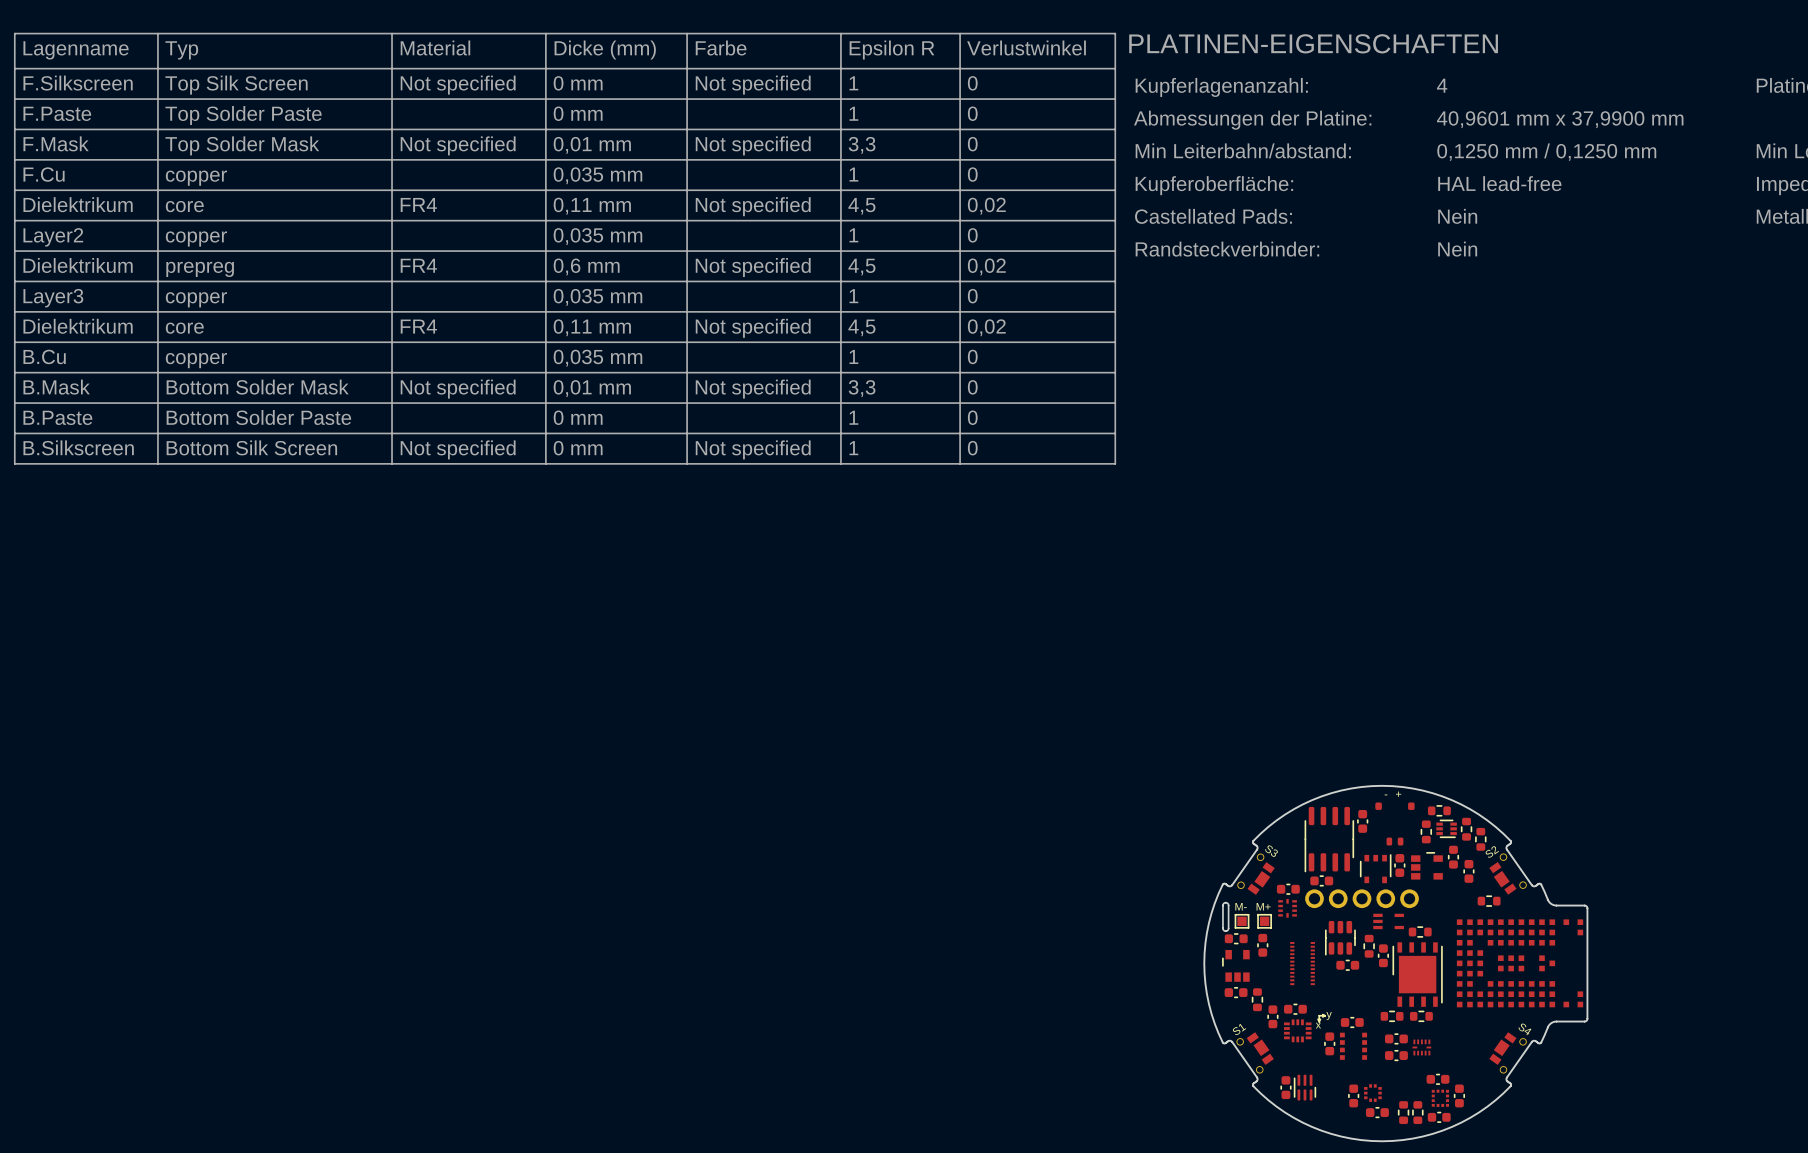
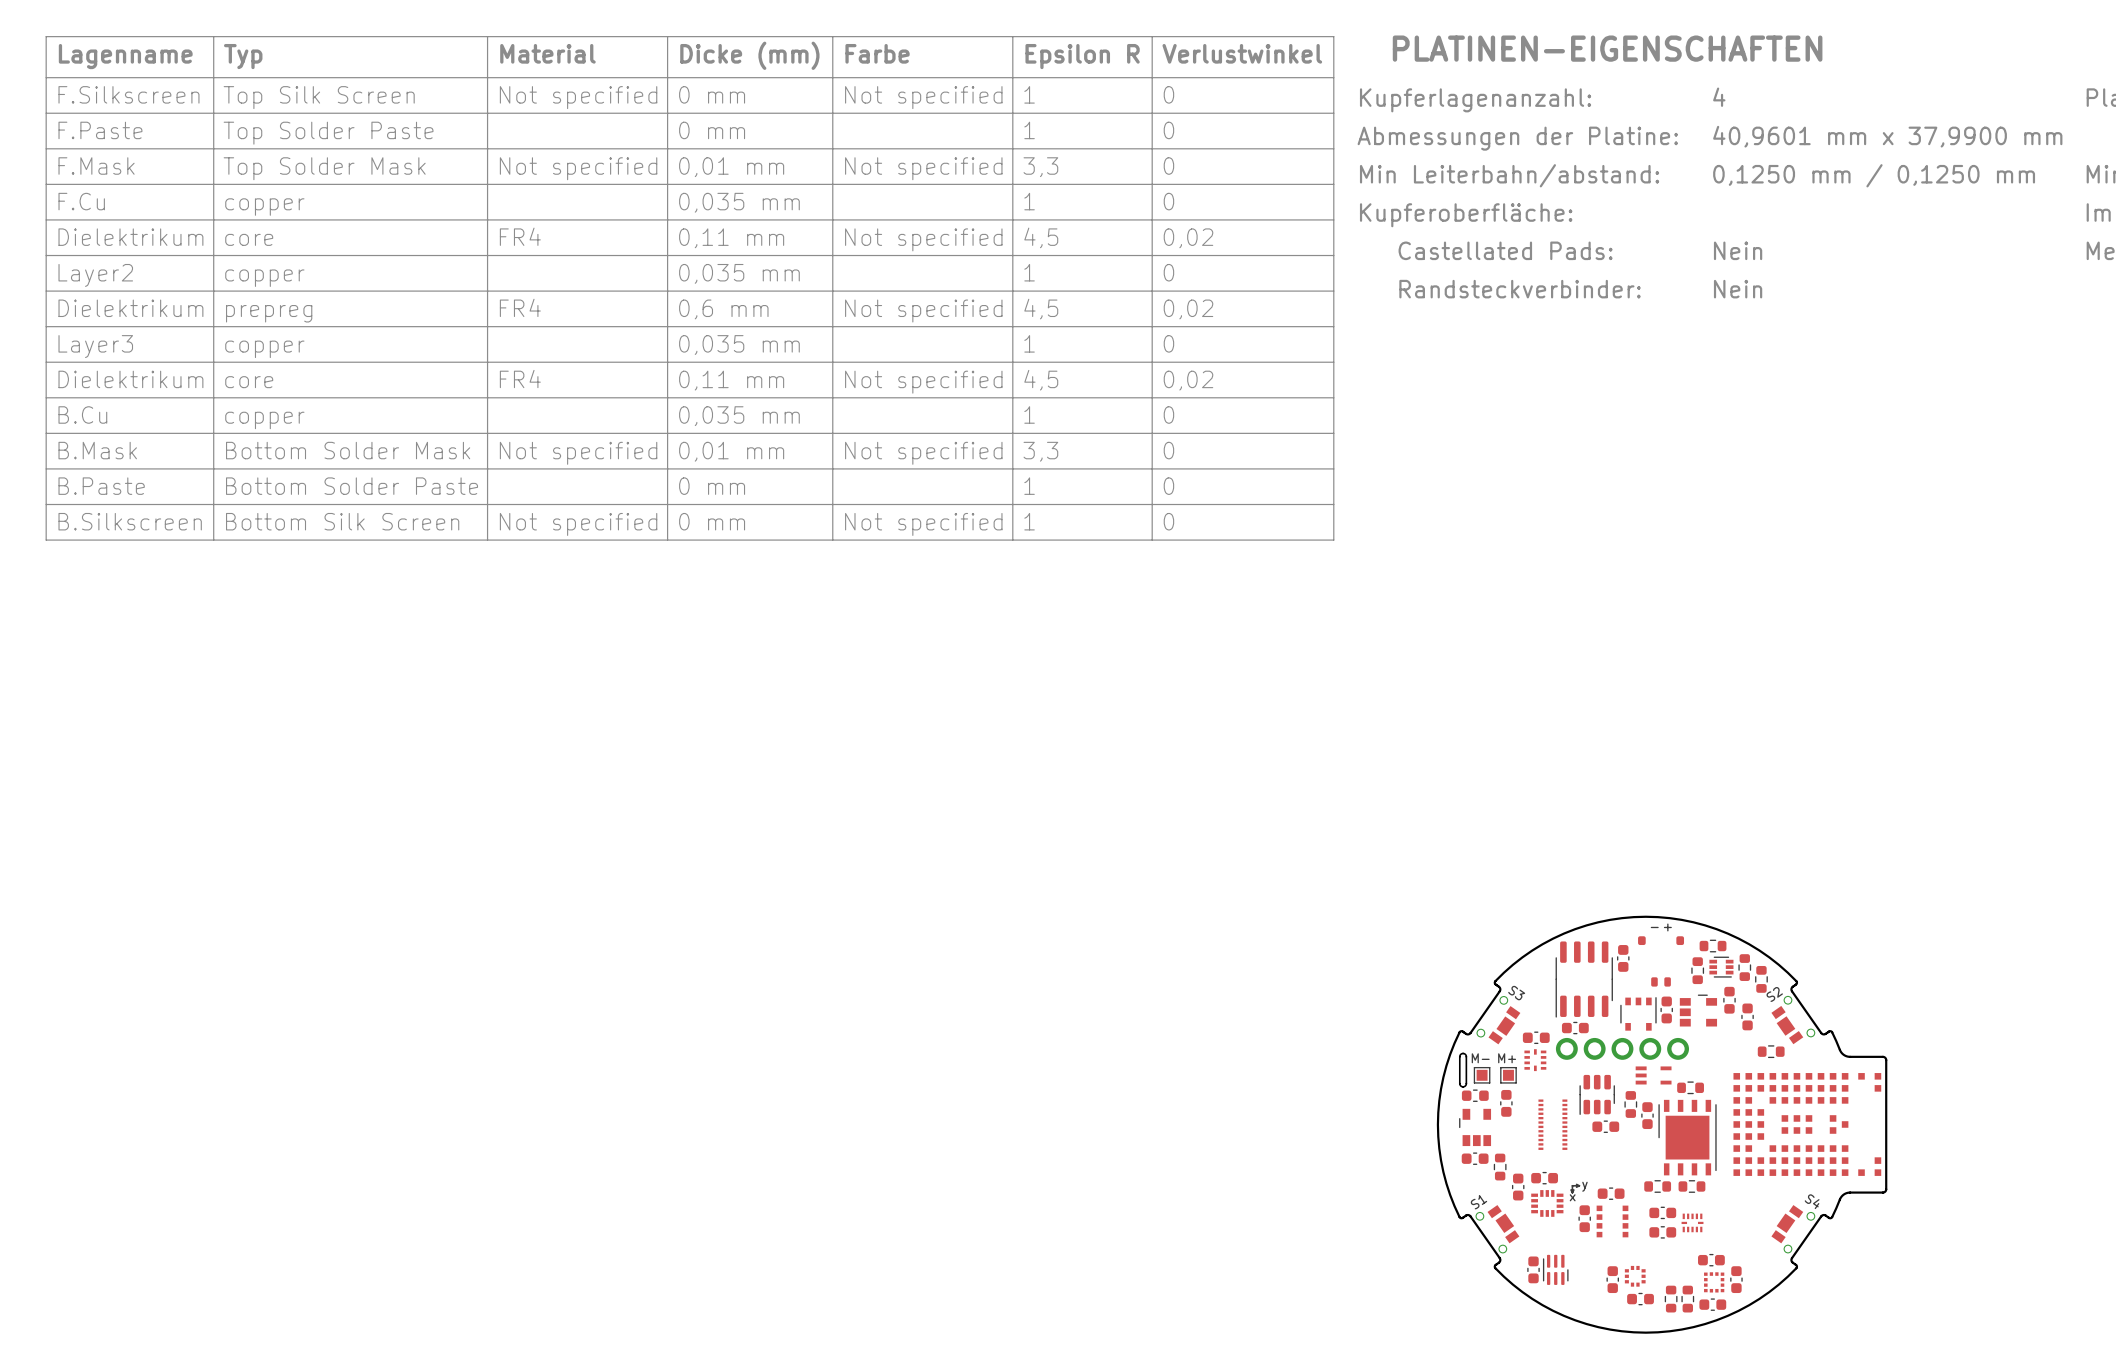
text position: PLATINEN-EIGENSCHAFTEN (1313, 43) -> PLATINEN-EIGENSCHAFTEN (1607, 48)
text: HAL lead-free (1499, 183) -> none
text position: Castellated Pads: (1213, 216) -> Castellated Pads: (1505, 250)
text position: Randsteckverbinder: (1227, 249) -> Randsteckverbinder: (1520, 289)

